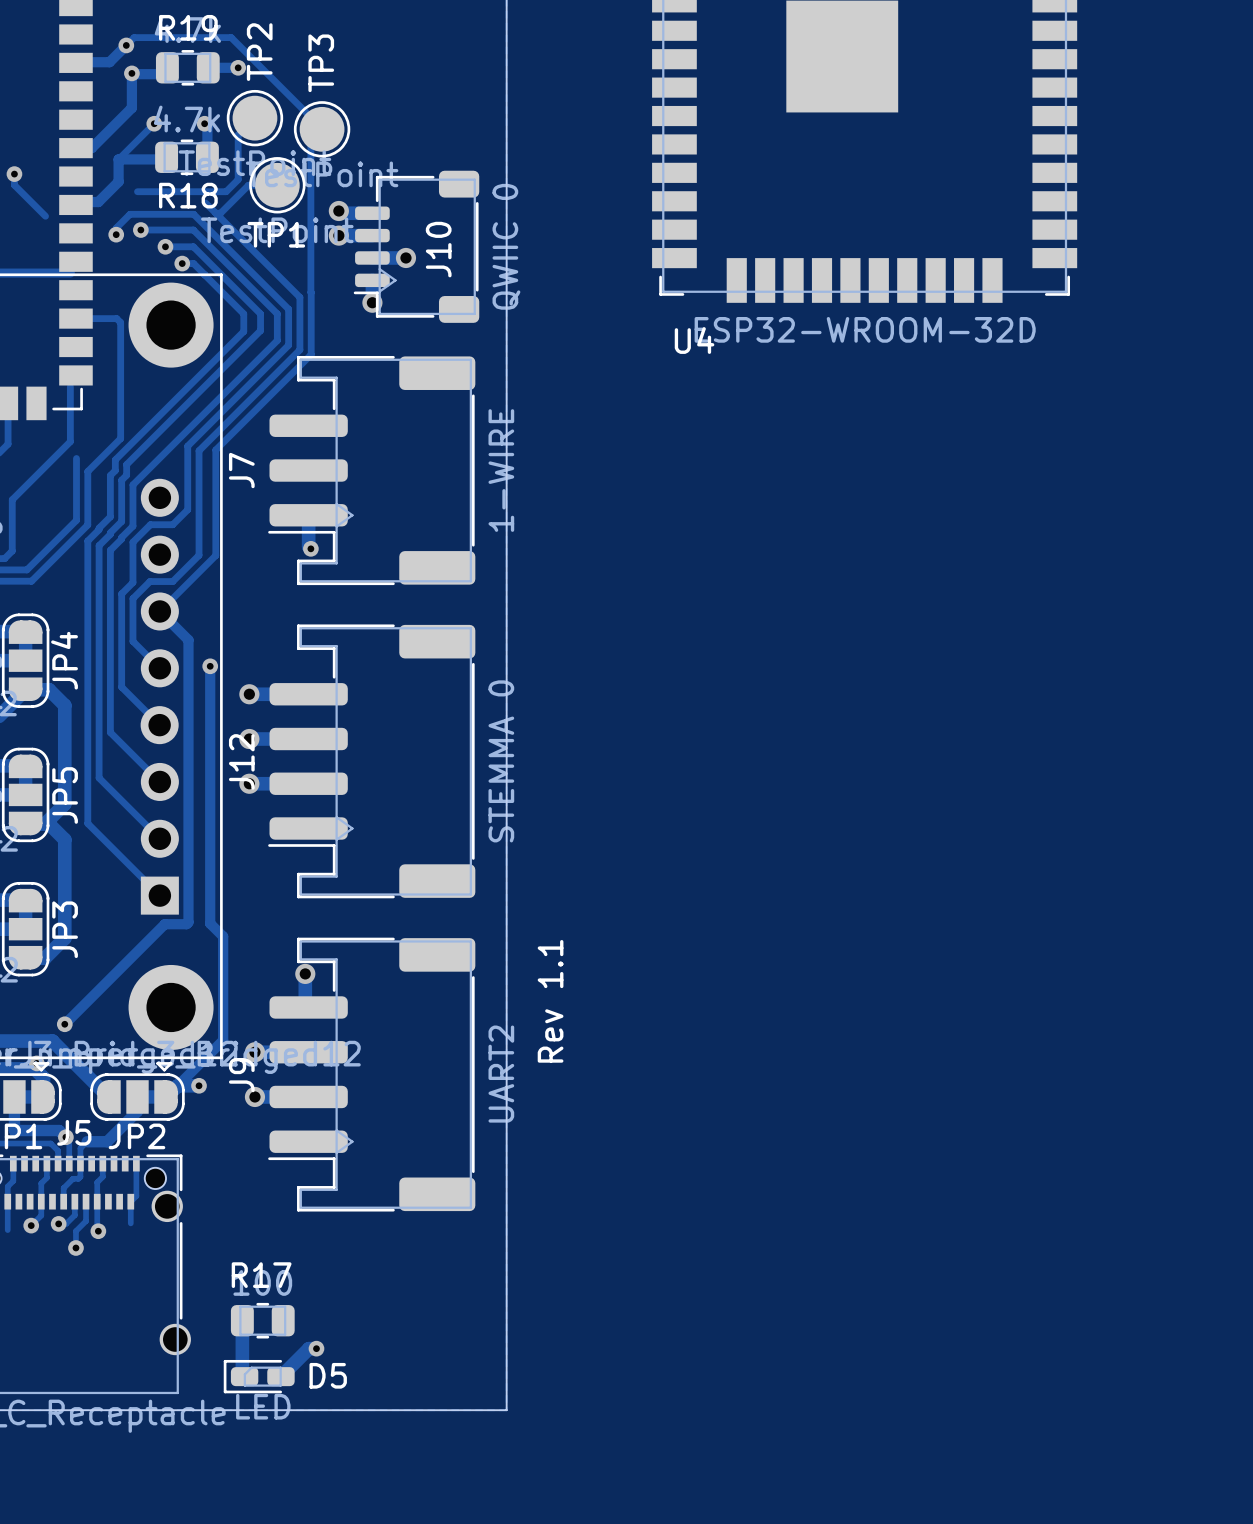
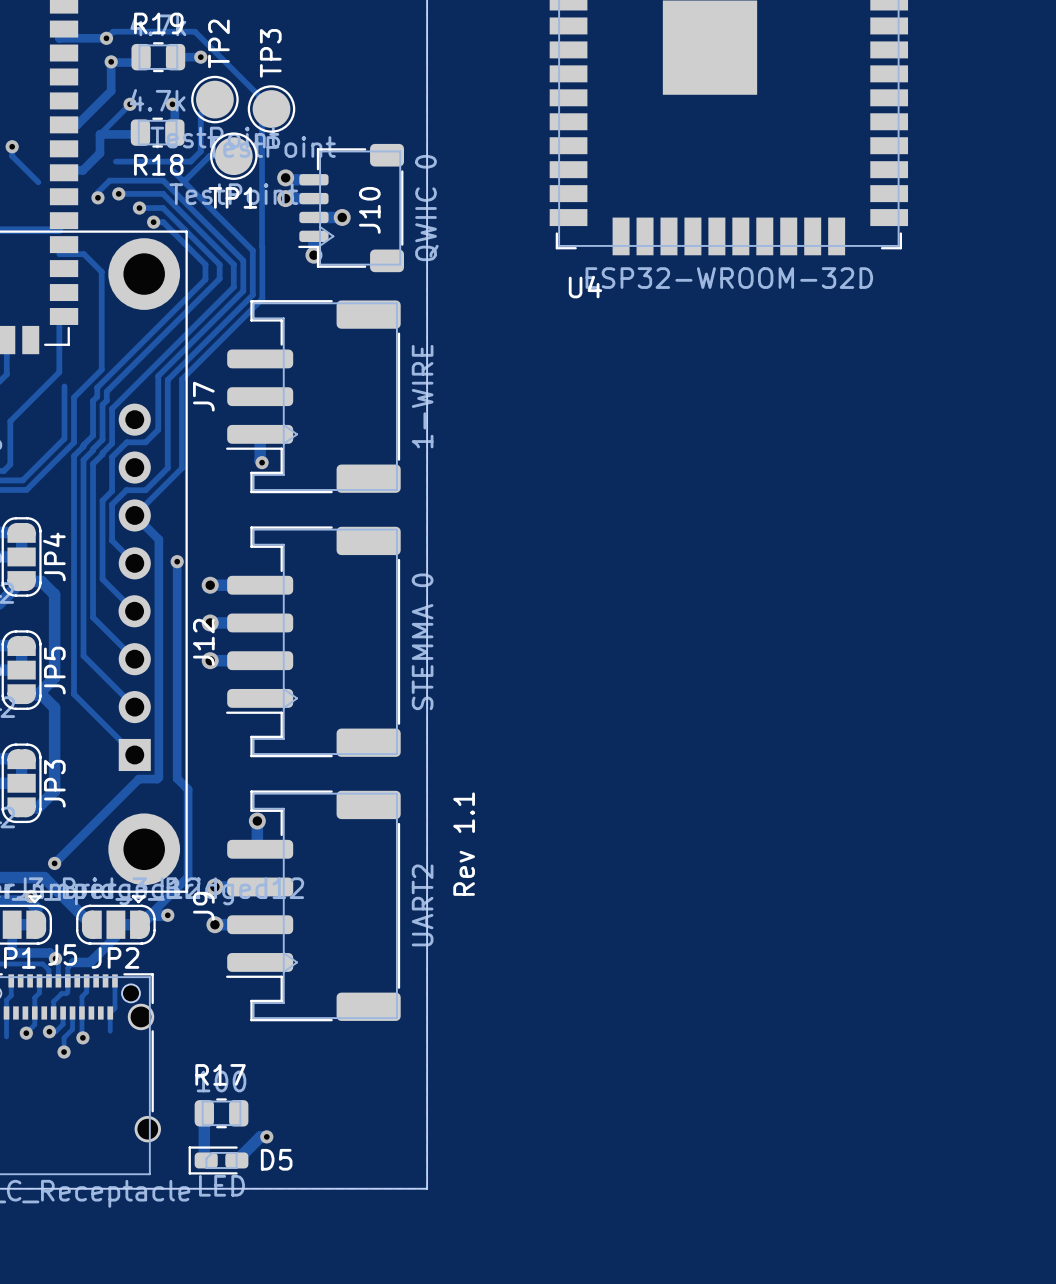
track: (126, 45) (109, 62) (70, 62) -> (106, 38) (59, 38)
track: (75, 318) (116, 318) -> (59, 254) (83, 254) (98, 268)

